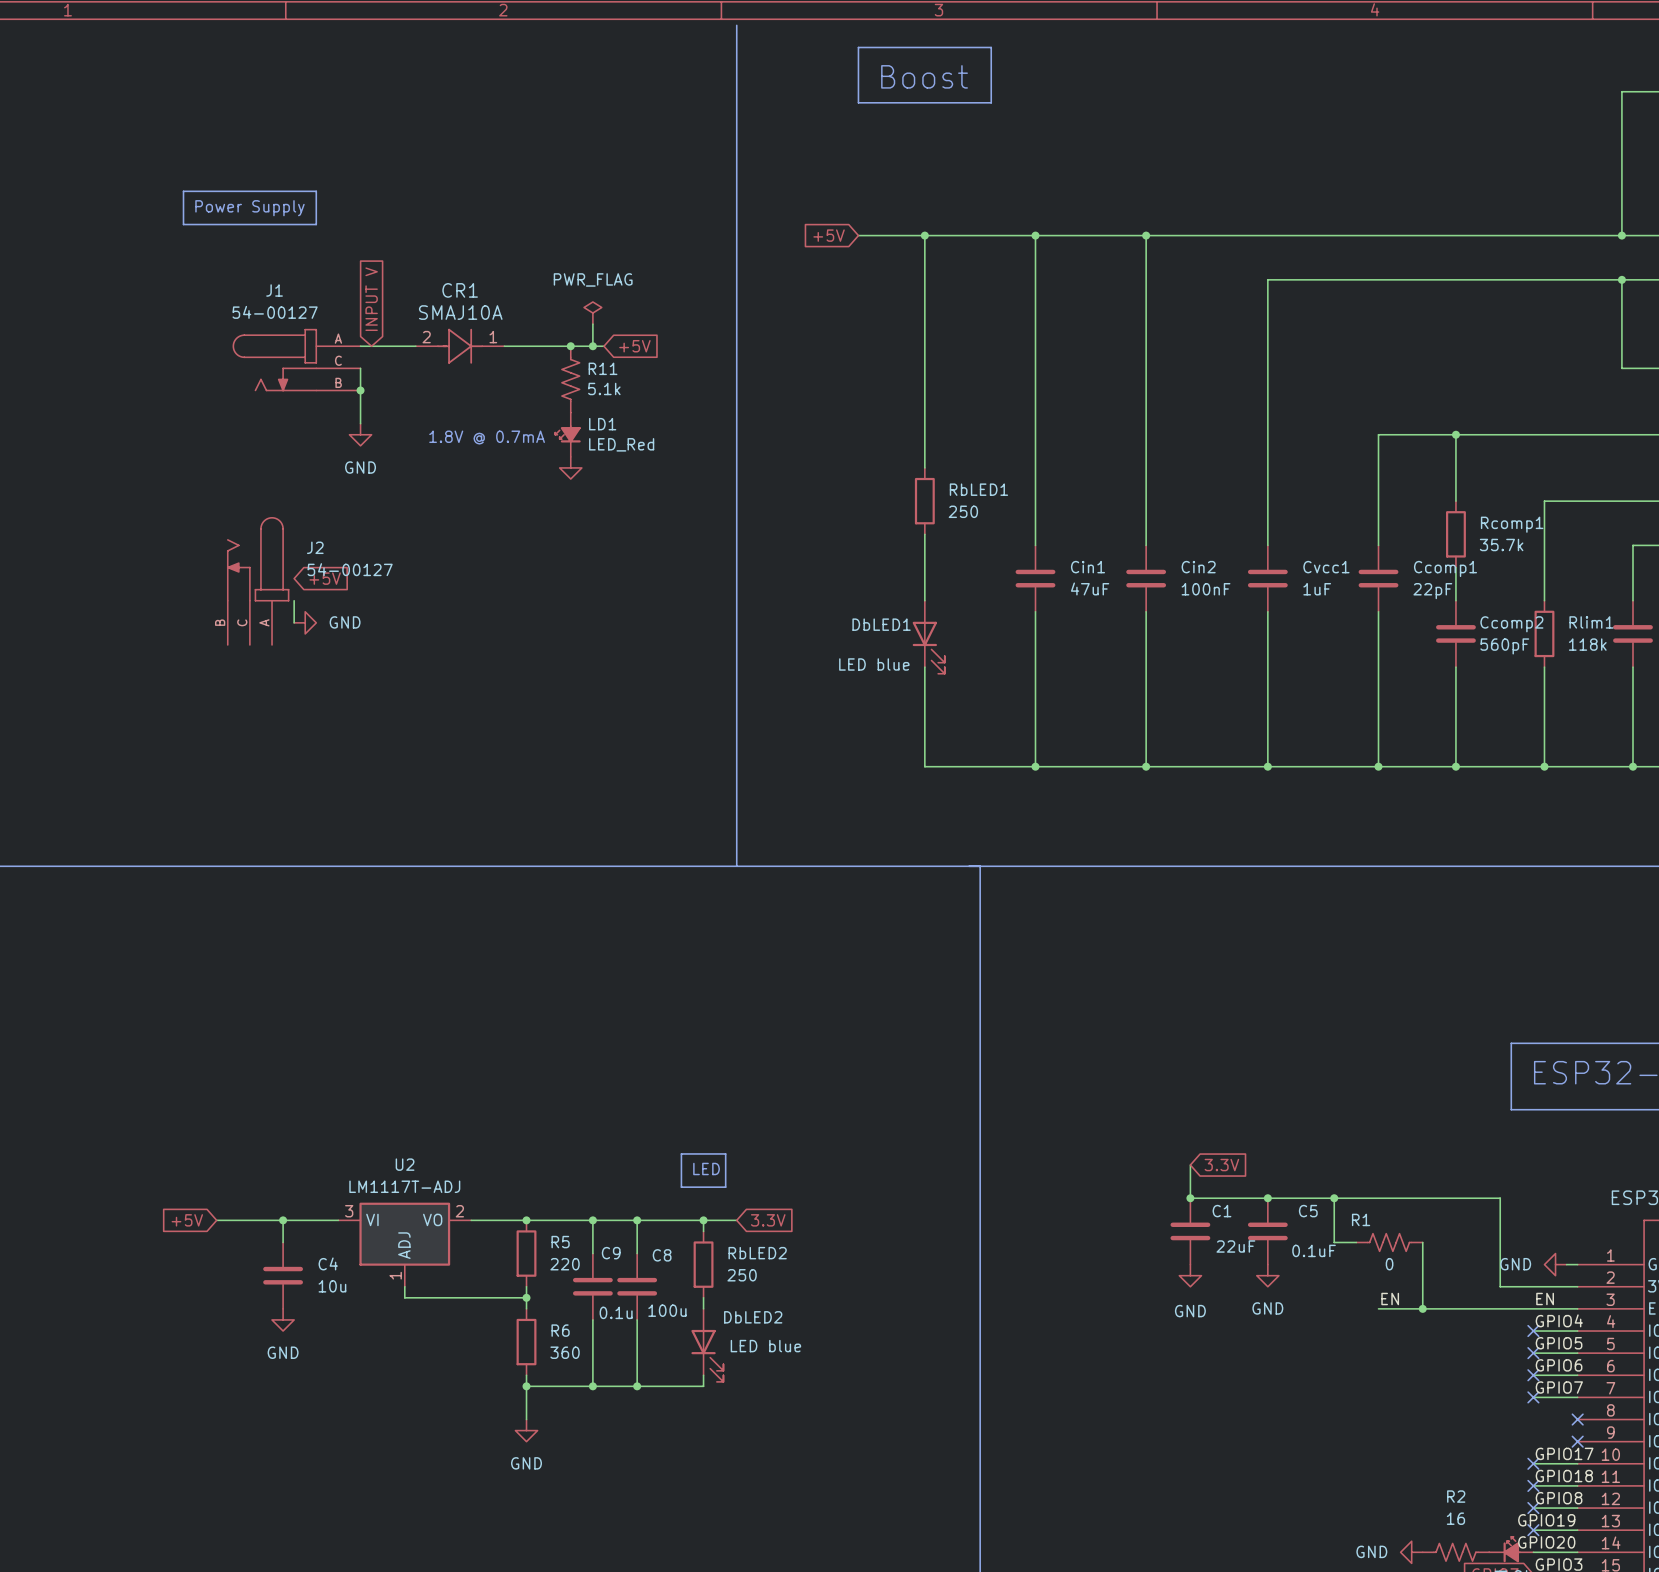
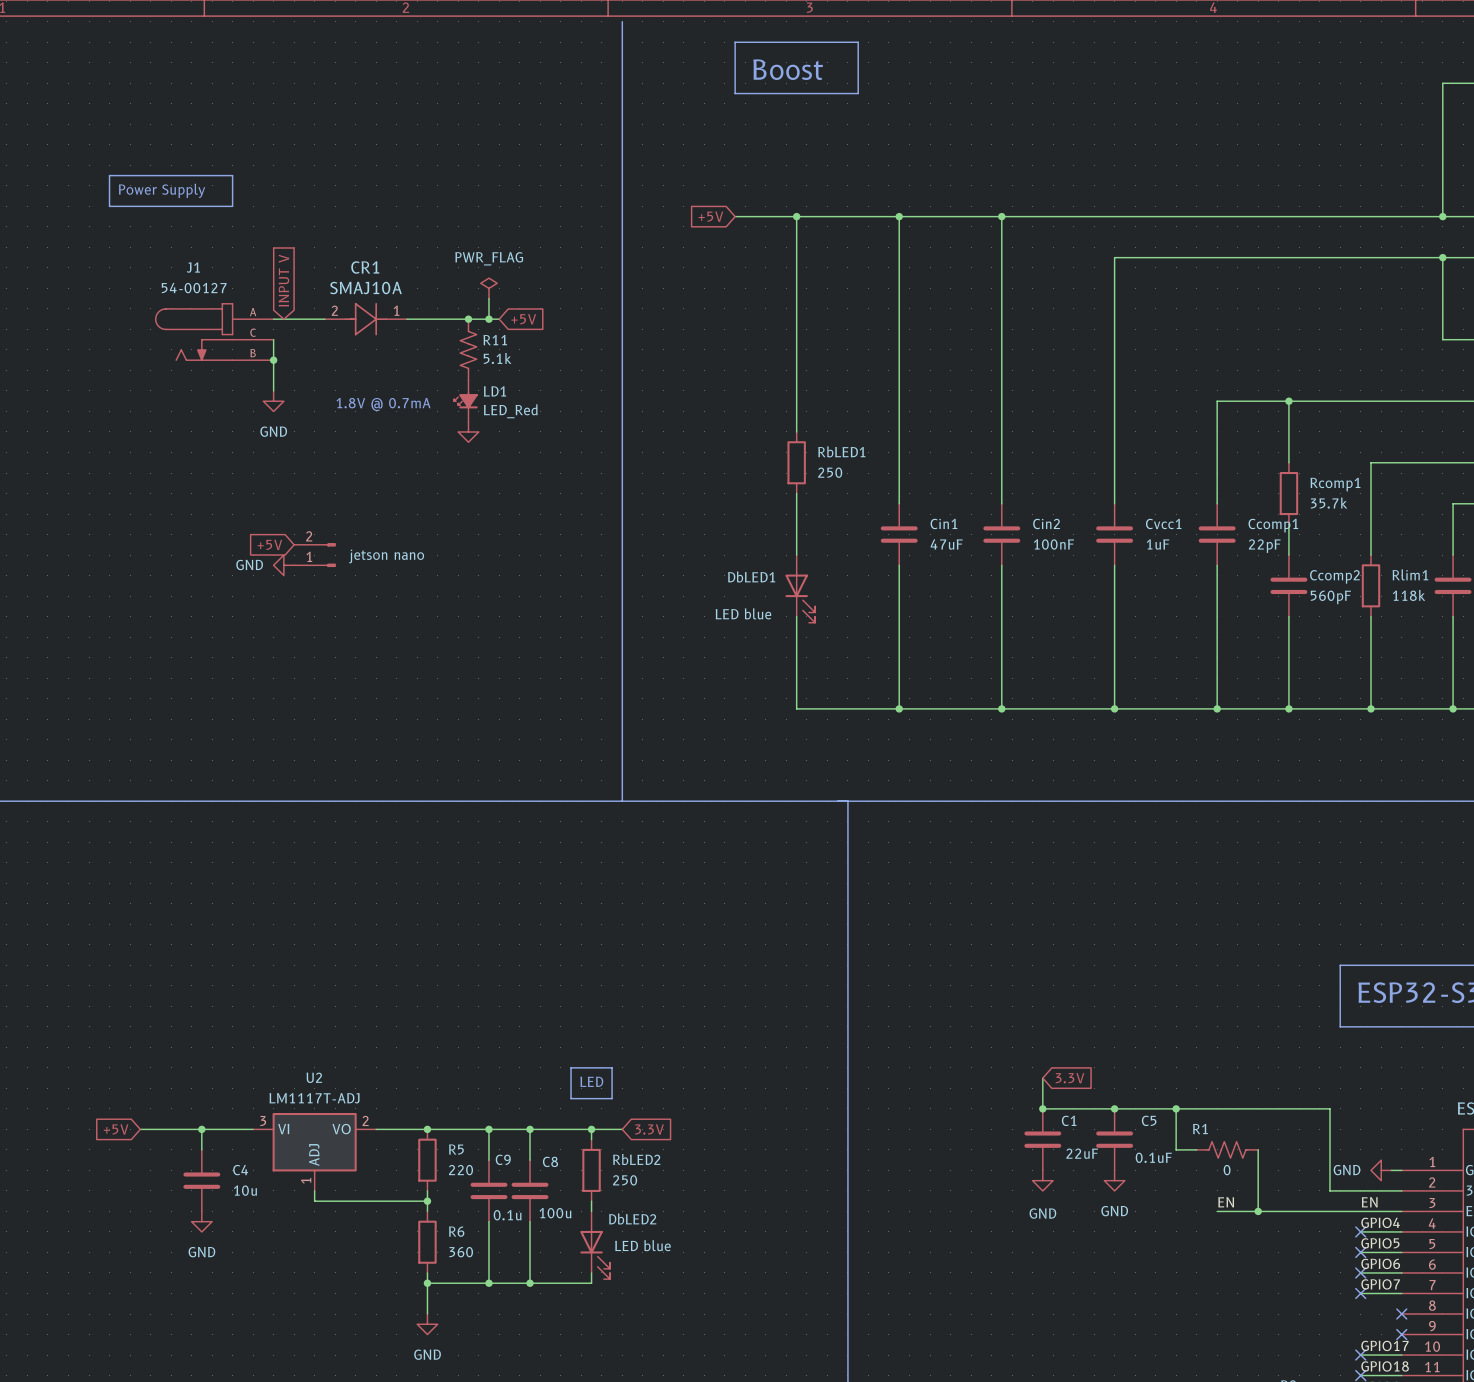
global label rotation: 0° (325, 578) -> 180° (269, 544)
J2: 54-00127 (258, 581) -> none
wire: (294, 600) (294, 622) -> none
part: none -> jetson nano (314, 555)
power symbol rotation: 0° (305, 622) -> 180° (283, 565)
power symbol position: GND (305, 622) -> GND (283, 565)

